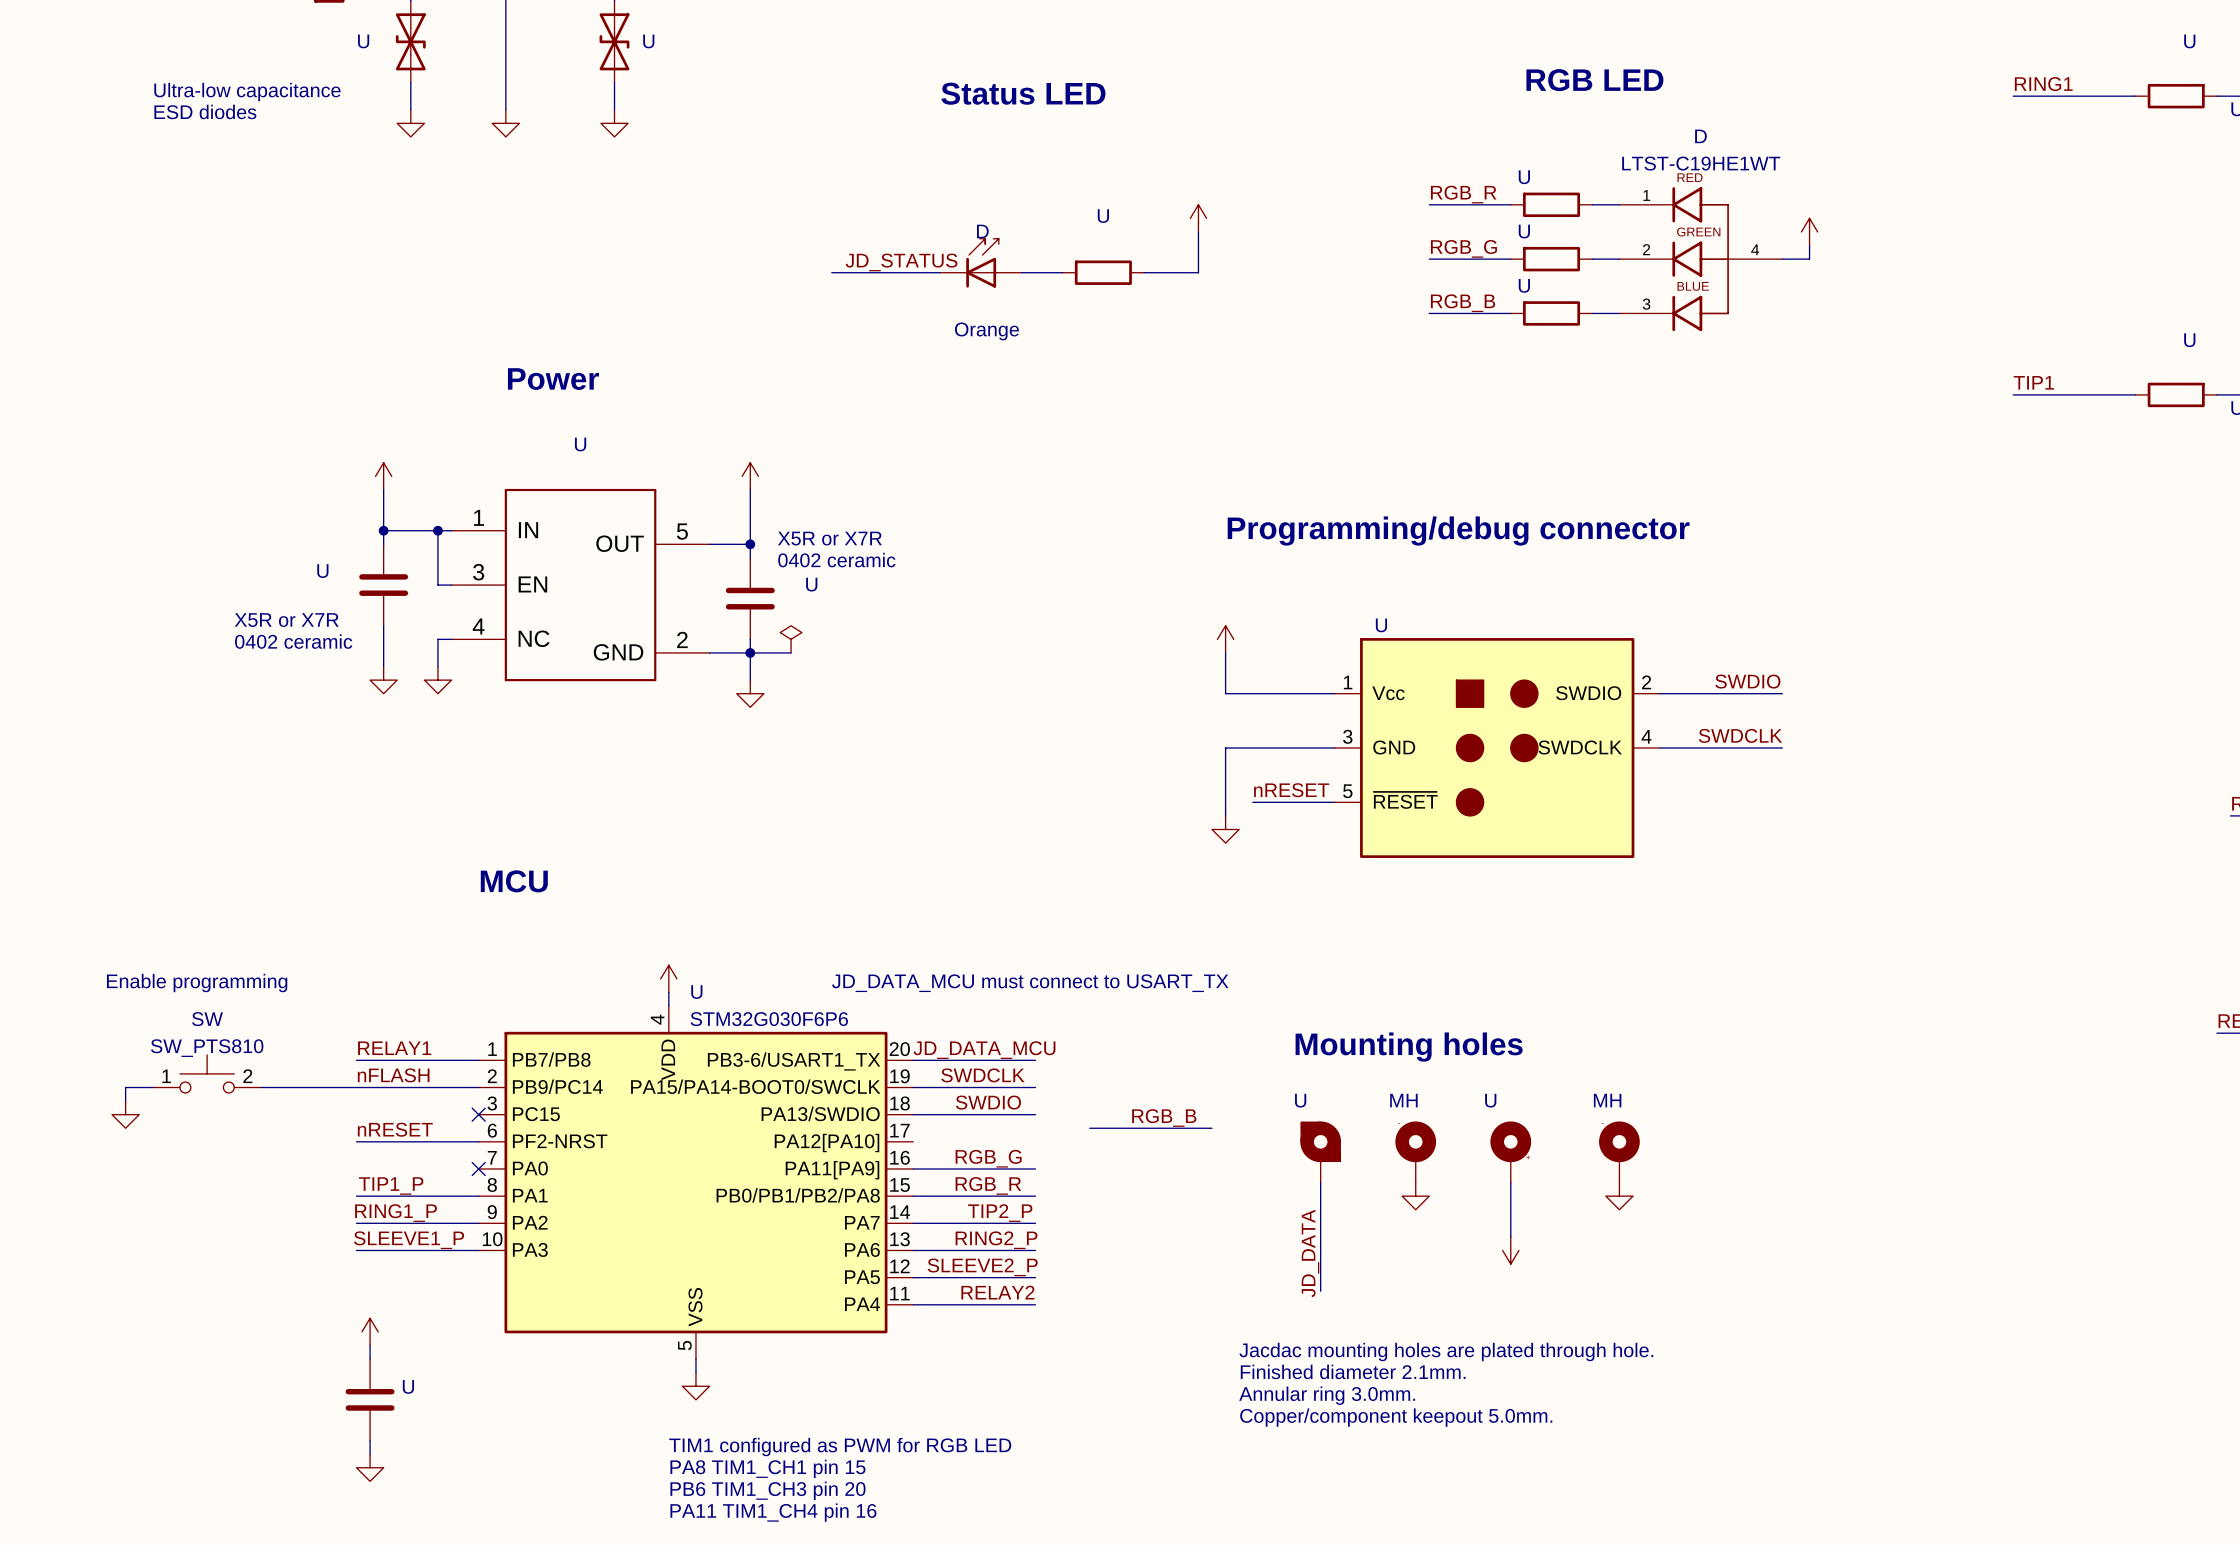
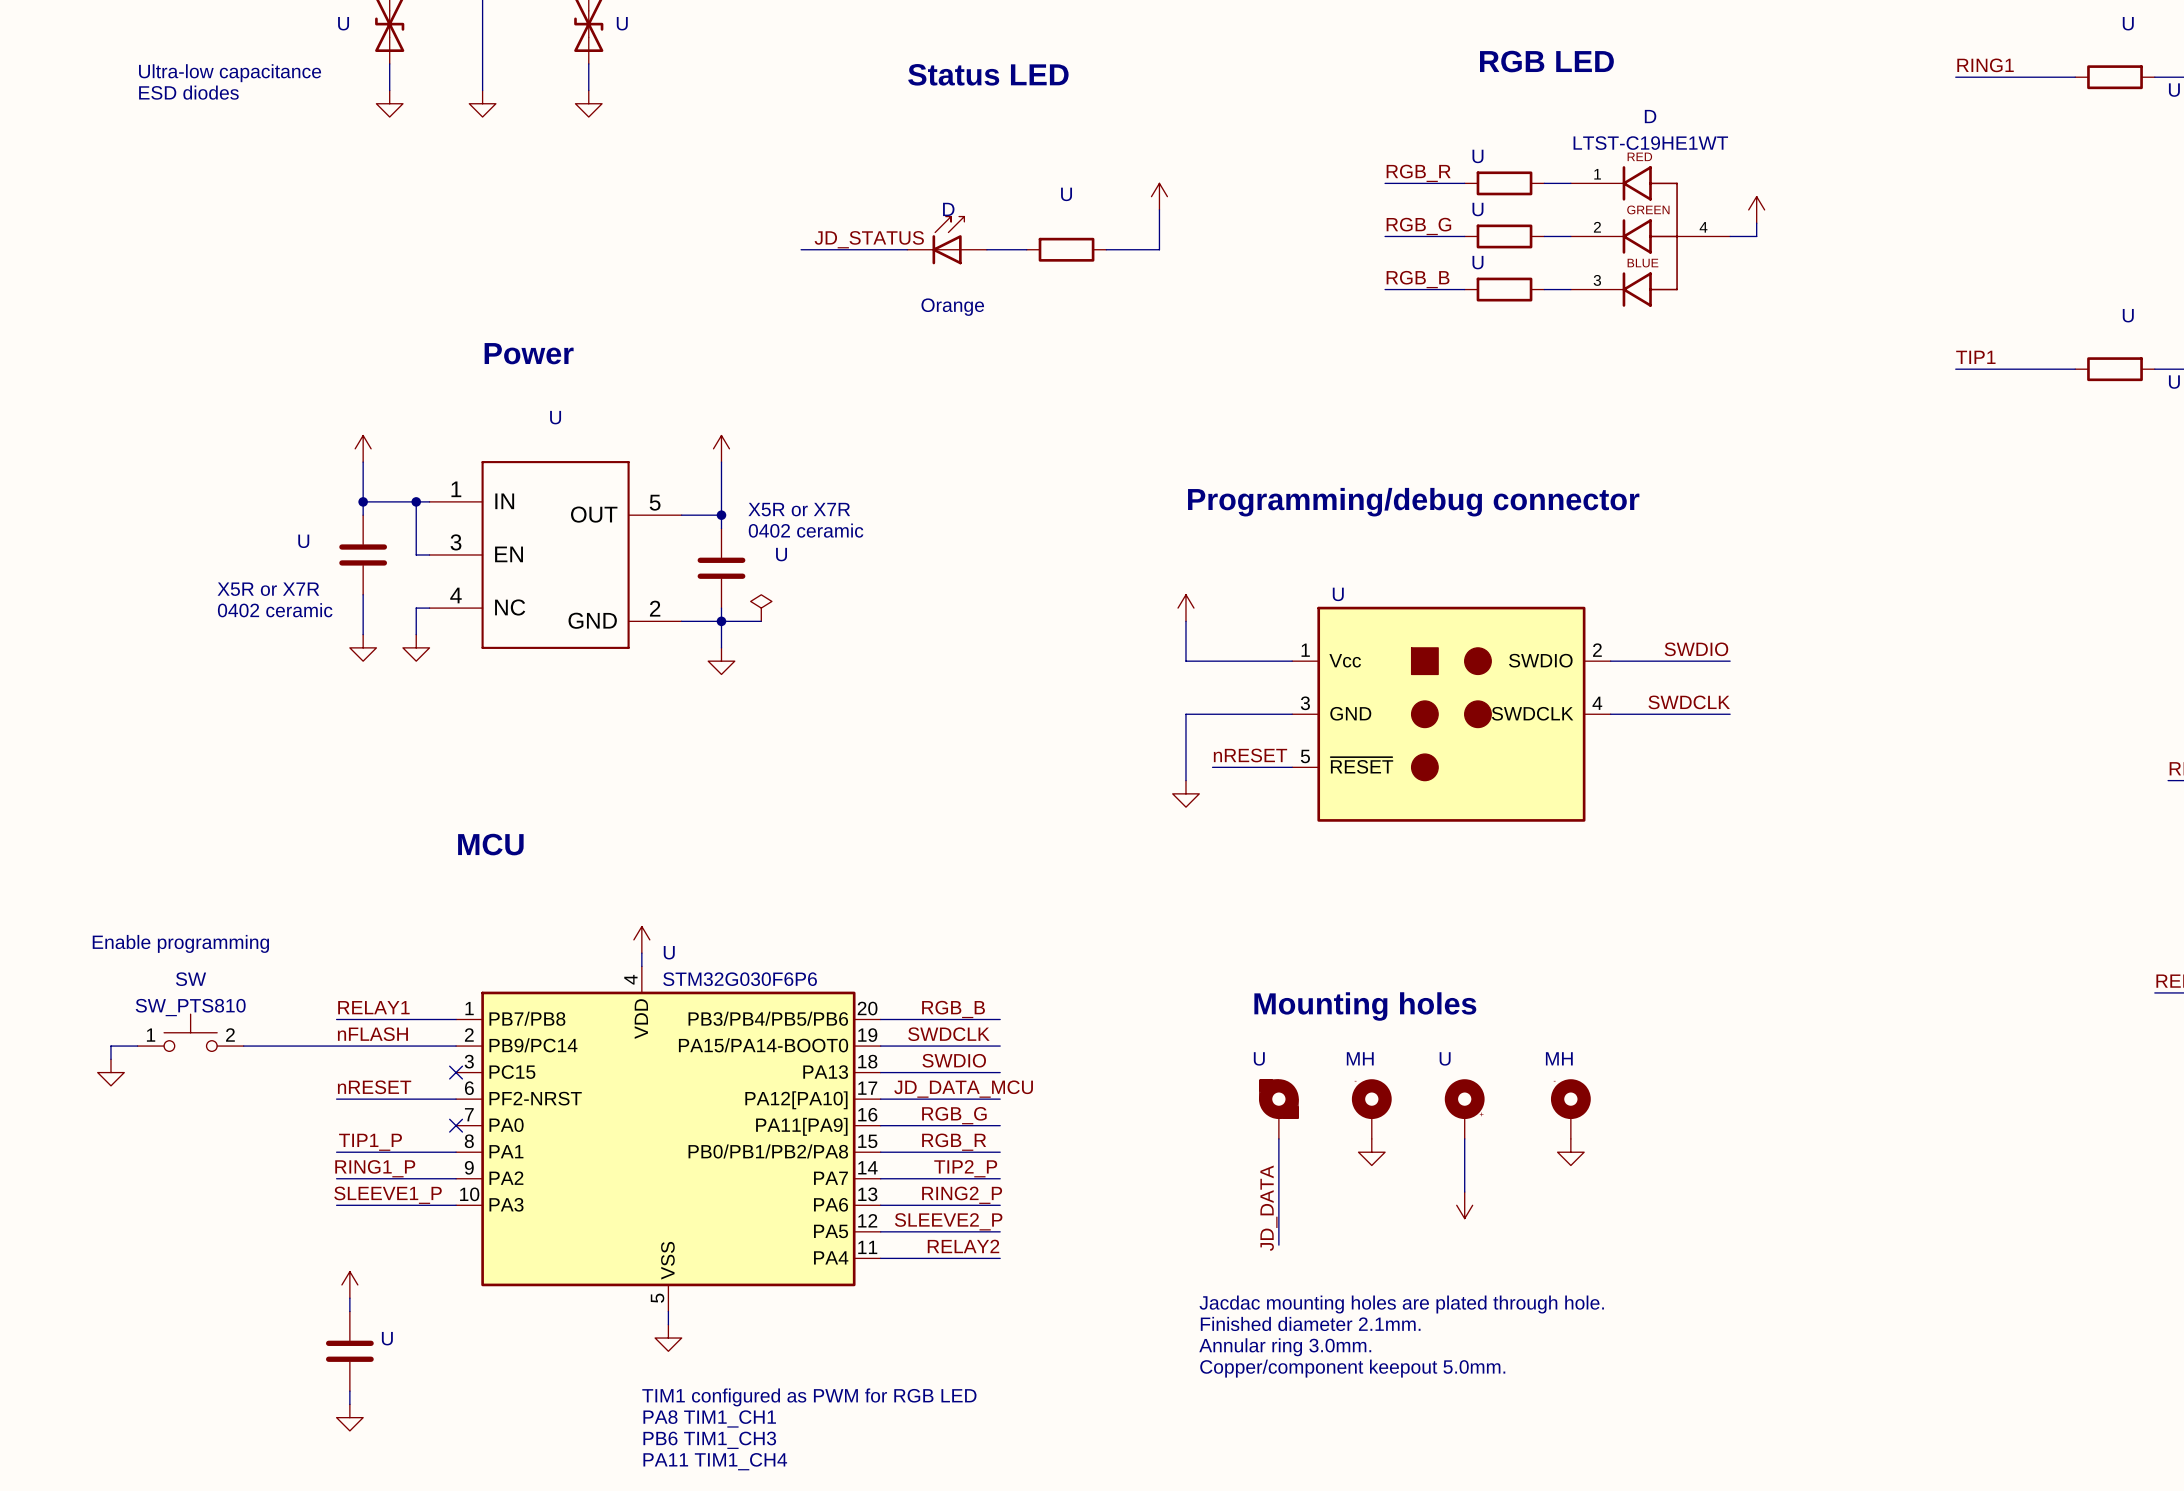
text: JD_DATA_MCU must connect to USART_TX (1030, 983) -> none
label position: JD_DATA_MCU (984, 1050) -> JD_DATA_MCU (963, 1089)
U pin name: PB3-6/USART1_TX (794, 1061) -> PB3/PB4/PB5/PB6 (768, 1018)
U pin name: PA15/PA14-BOOT0/SWCLK (755, 1086) -> PA15/PA14-BOOT0 (763, 1045)
U pin name: PA13/SWDIO (820, 1113) -> PA13 (825, 1072)
label position: RGB_B (1164, 1117) -> RGB_B (953, 1009)
wire: (1089, 1128) (1212, 1128) -> (880, 1099) (1000, 1099)
text: PA8 TIM1_CH1 pin 15 (767, 1468) -> PA8 TIM1_CH1 (709, 1418)
text: PB6 TIM1_CH3 pin 20 (767, 1490) -> PB6 TIM1_CH3 (709, 1440)
text: PA11 TIM1_CH4 pin 16 (773, 1512) -> PA11 TIM1_CH4 (715, 1461)

